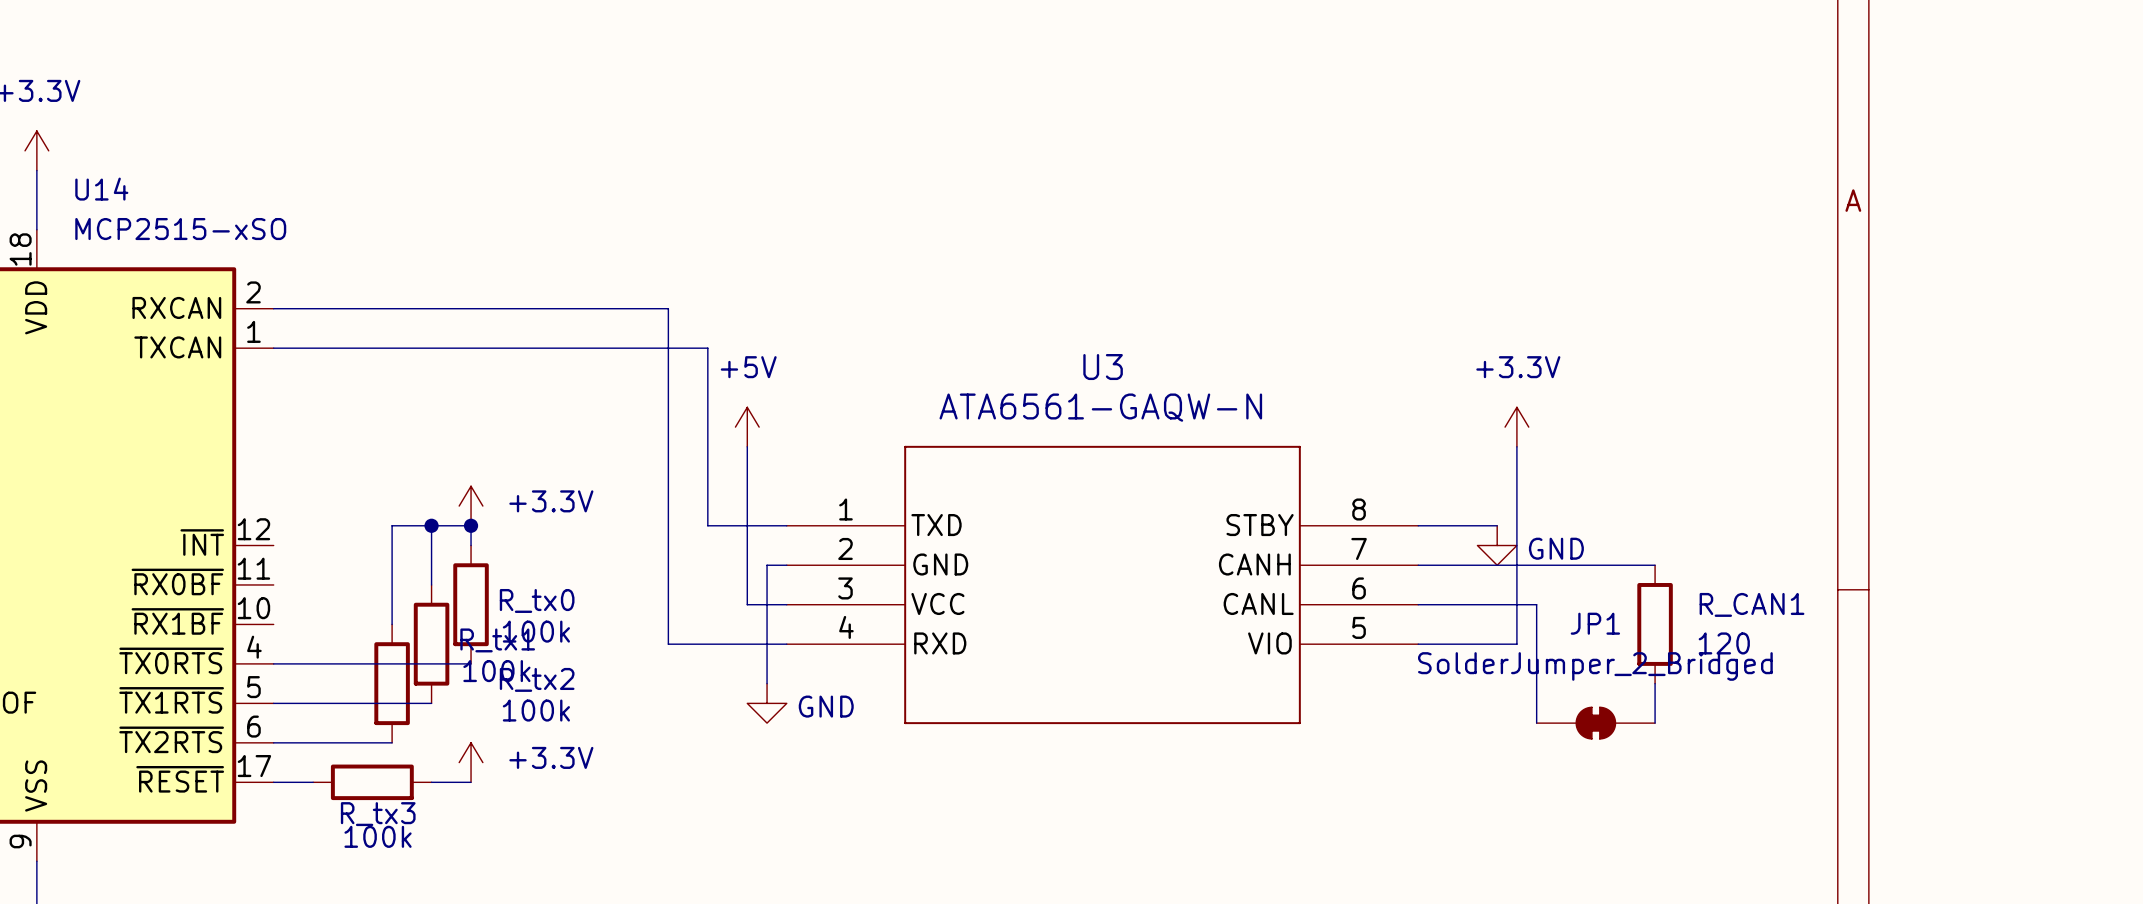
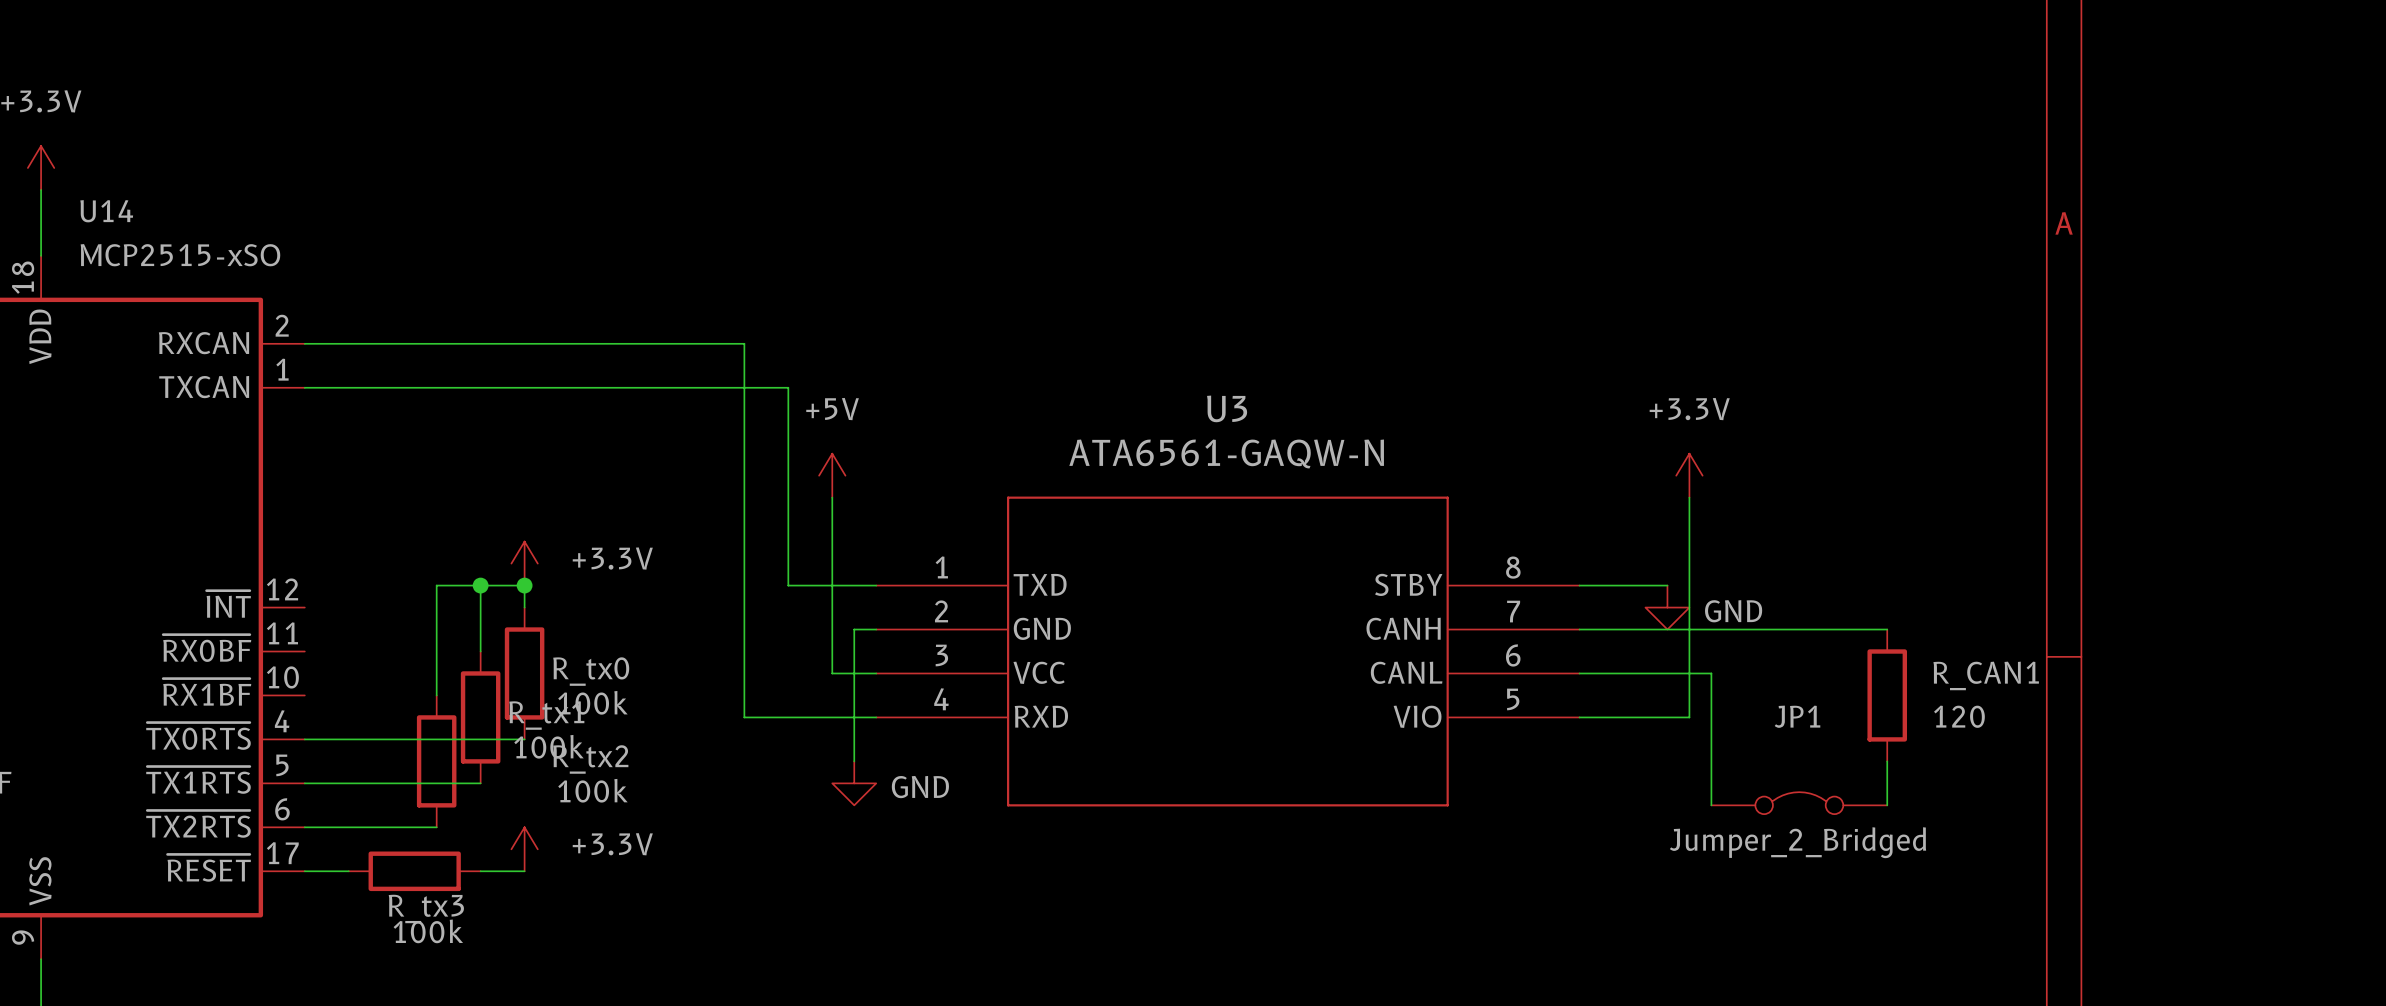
wire: none -> (1843, 629) (1887, 629)
R_CAN1 position: (1655, 624) -> (1887, 695)
JP1 value: SolderJumper_2_Bridged (1595, 666) -> Jumper_2_Bridged (1798, 842)
wire: (1655, 683) (1655, 723) -> (1887, 761) (1887, 805)
JP1 symbol: [1536, 707, 1656, 739] -> [1711, 792, 1888, 815]

